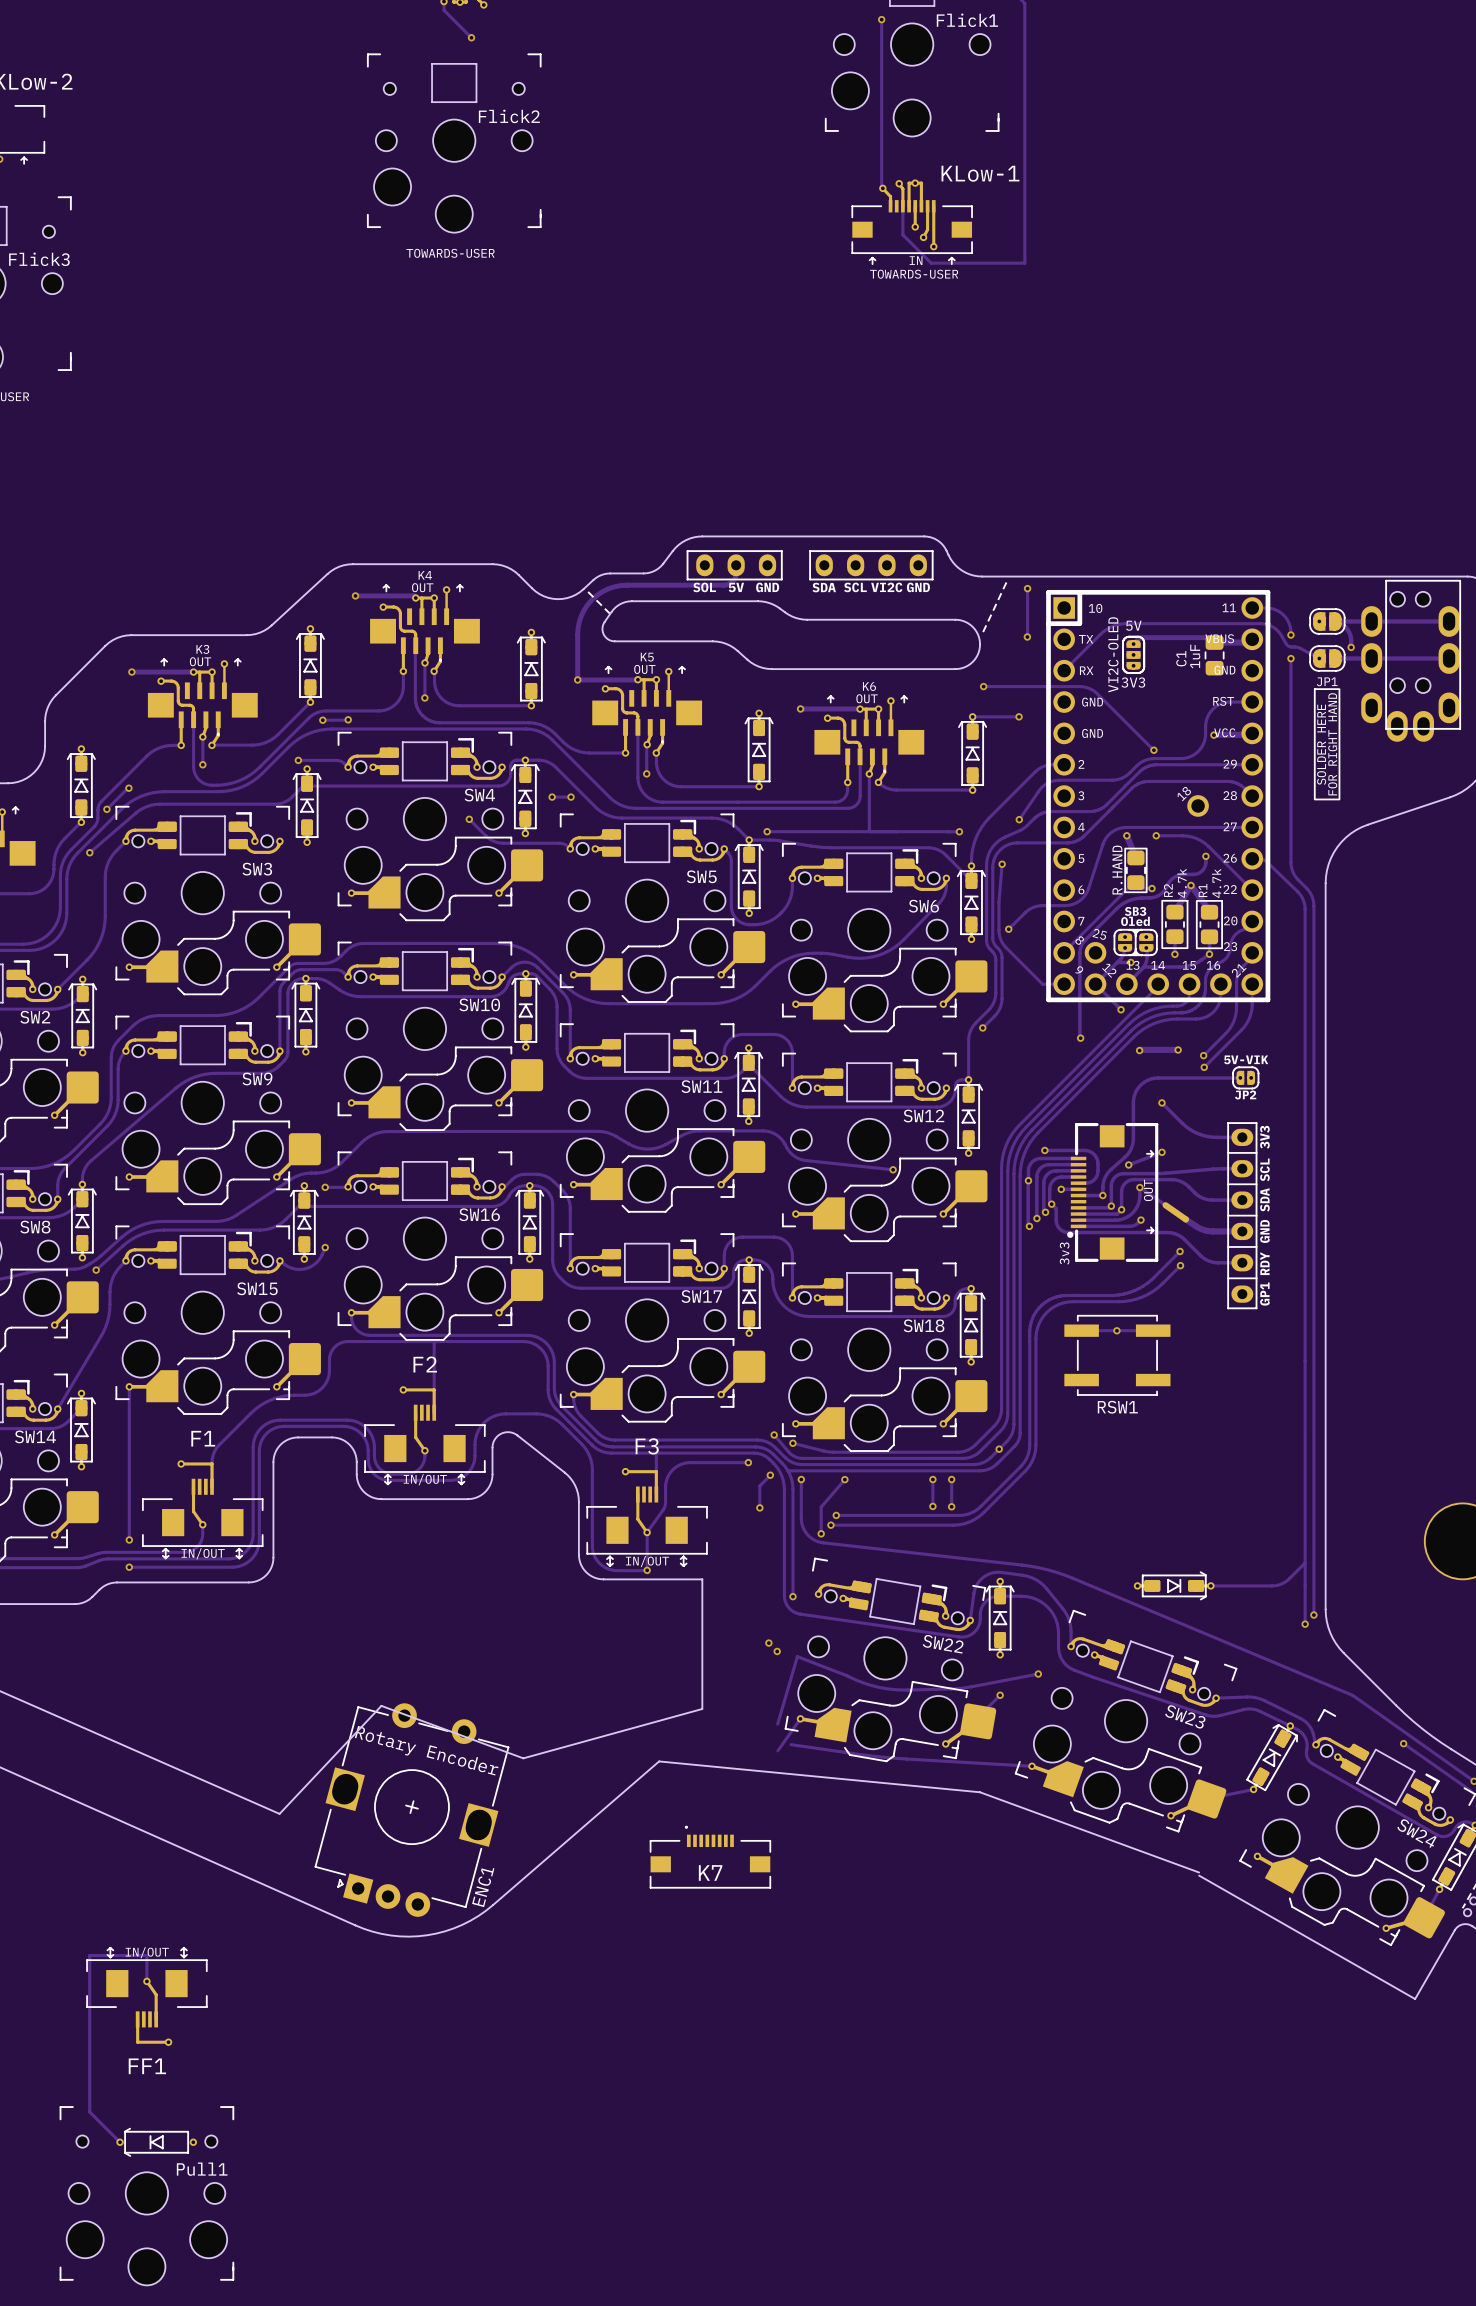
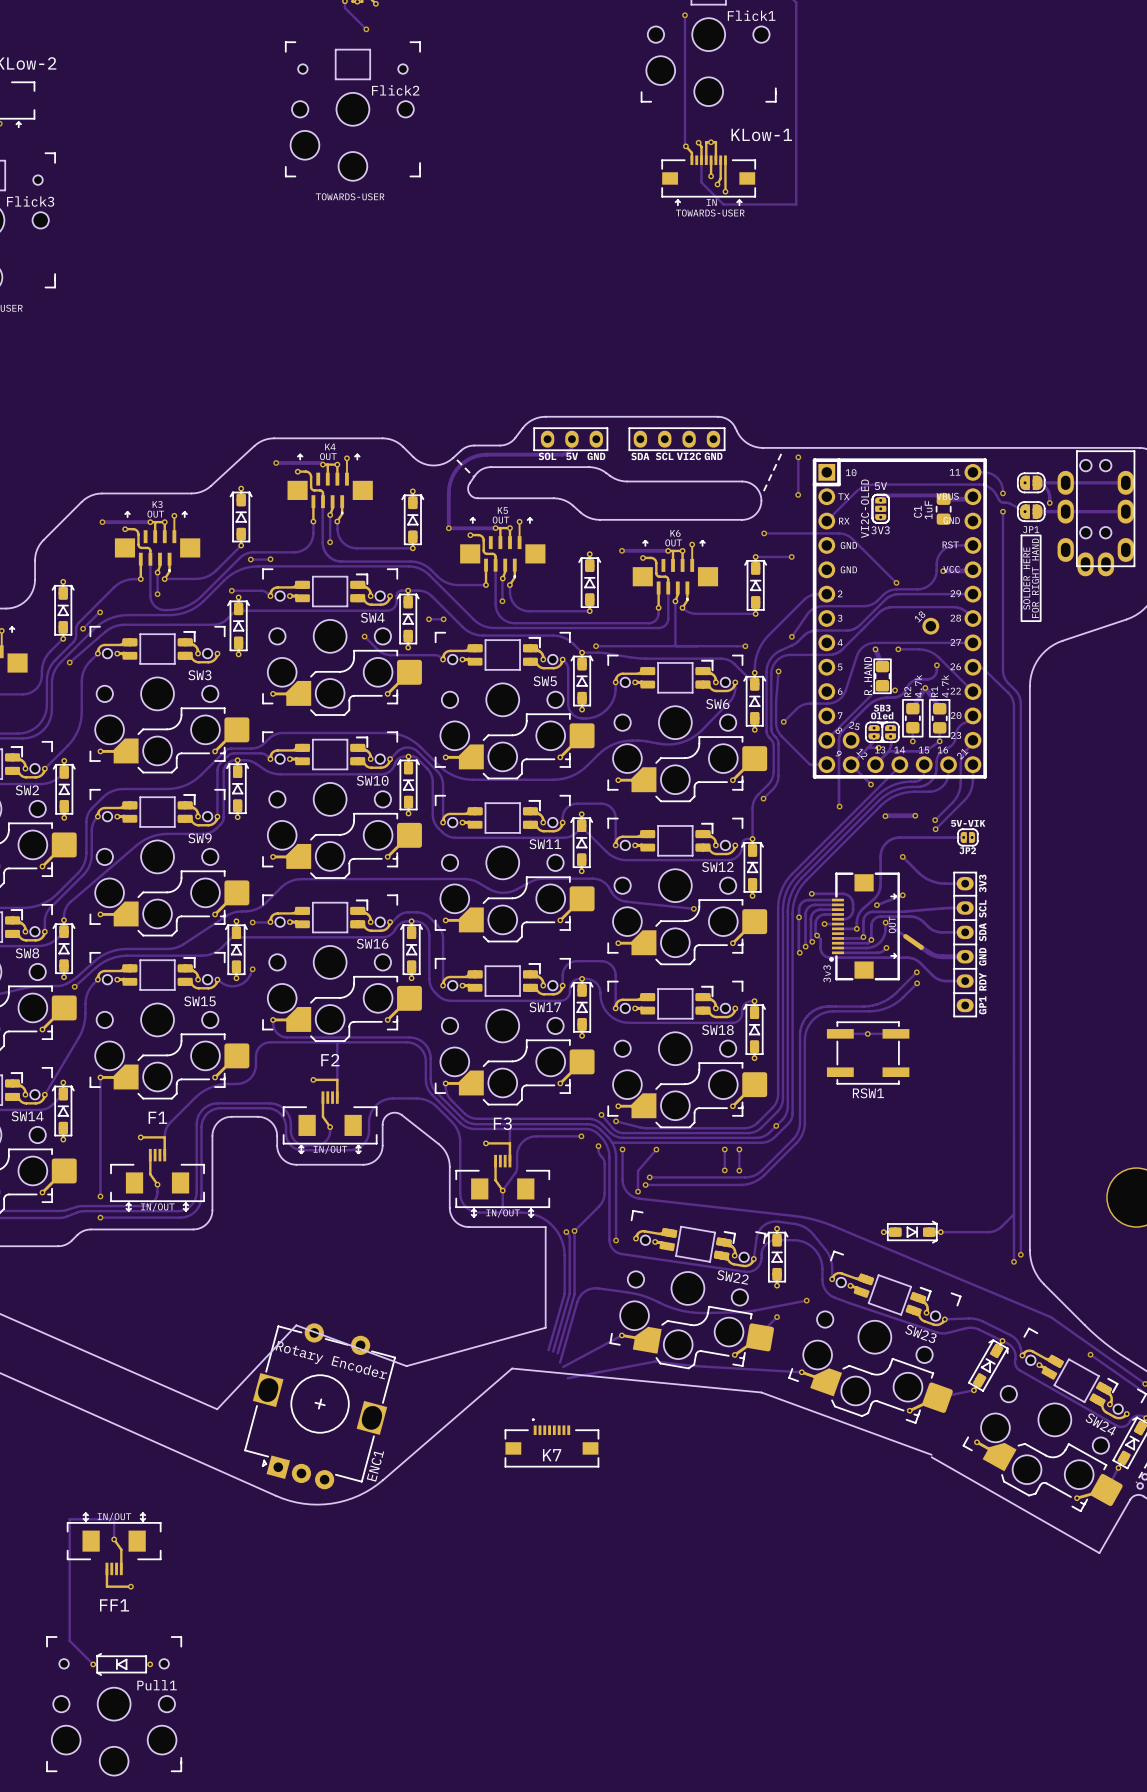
track: (770, 1475) (759, 1485) (759, 1507) -> (598, 1146) (599, 1153) (604, 1162) (604, 1196) (600, 1205) (574, 1231) (574, 1294) (557, 1353)
via: (759, 1507) -> none
track: (592, 1536) (594, 1556) (606, 1568) (614, 1570) (647, 1570) (647, 1560) -> (460, 1193) (463, 1203) (473, 1211) (531, 1213) (548, 1222) (558, 1232) (564, 1250) (564, 1293) (548, 1350)
via: (647, 1570) -> none
via: none -> (574, 1231)
track: none -> (566, 1232) (569, 1237) (569, 1293) (553, 1351)
via: none -> (566, 1232)
via: (768, 1643) -> none
via: (777, 1651) -> none
track: (846, 1675) (797, 1656) (777, 1724) -> (657, 1301) (626, 1292) (595, 1288) (585, 1291) (578, 1300) (560, 1362)
track: (800, 1718) (777, 1750) -> (621, 1335) (563, 1366)
track: (790, 1744) (844, 1752) -> (567, 1378) (655, 1361)

